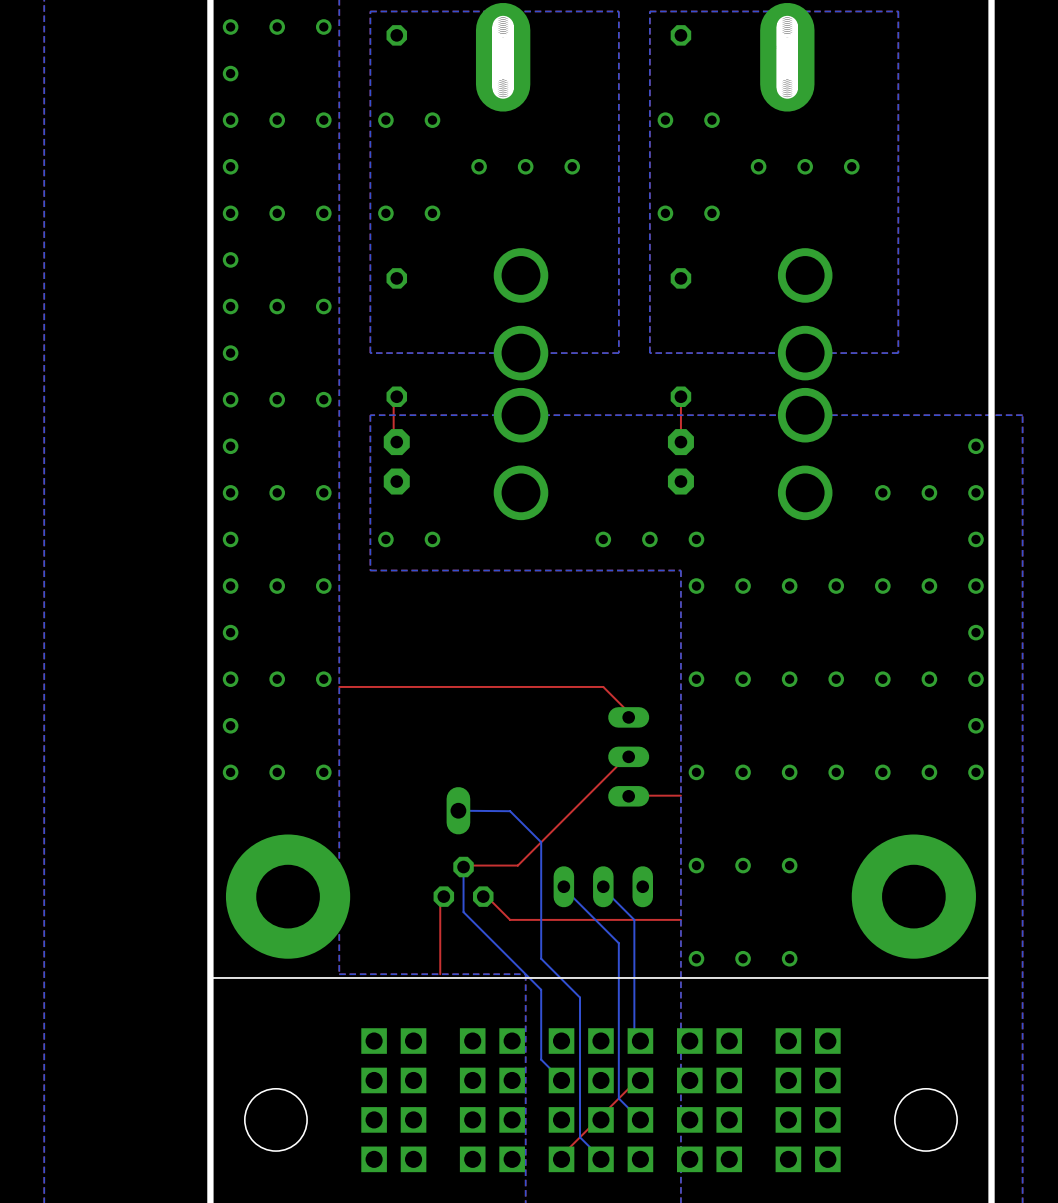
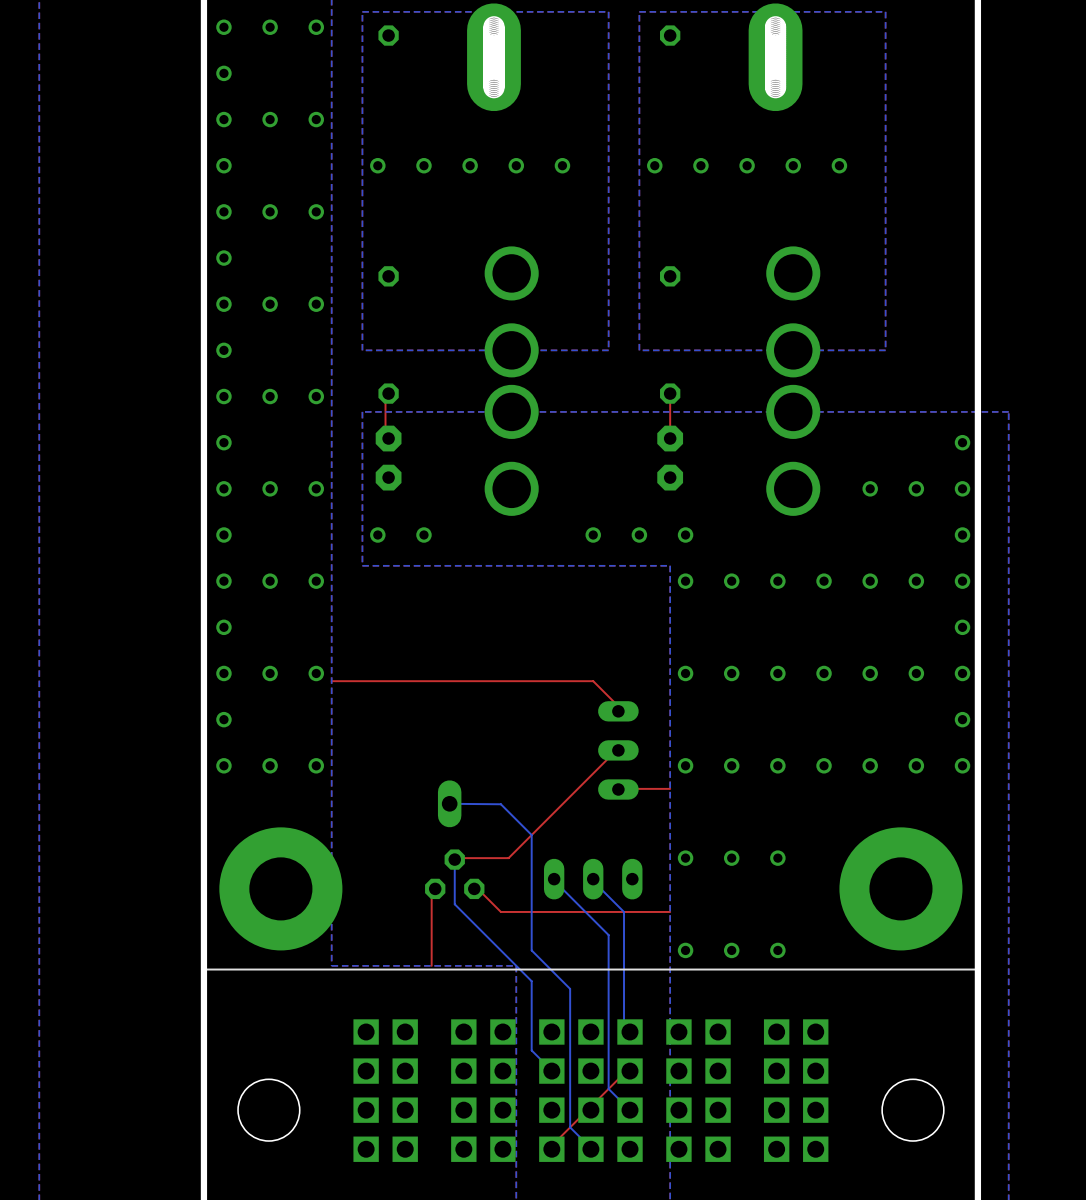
via: (385, 120) -> none
via: (432, 120) -> none
via: (665, 120) -> none
via: (712, 120) -> none
via: none -> (377, 165)
via: none -> (423, 165)
via: none -> (654, 165)
via: none -> (700, 165)
via: (385, 213) -> none
via: (432, 213) -> none
via: (665, 213) -> none
via: (712, 213) -> none

